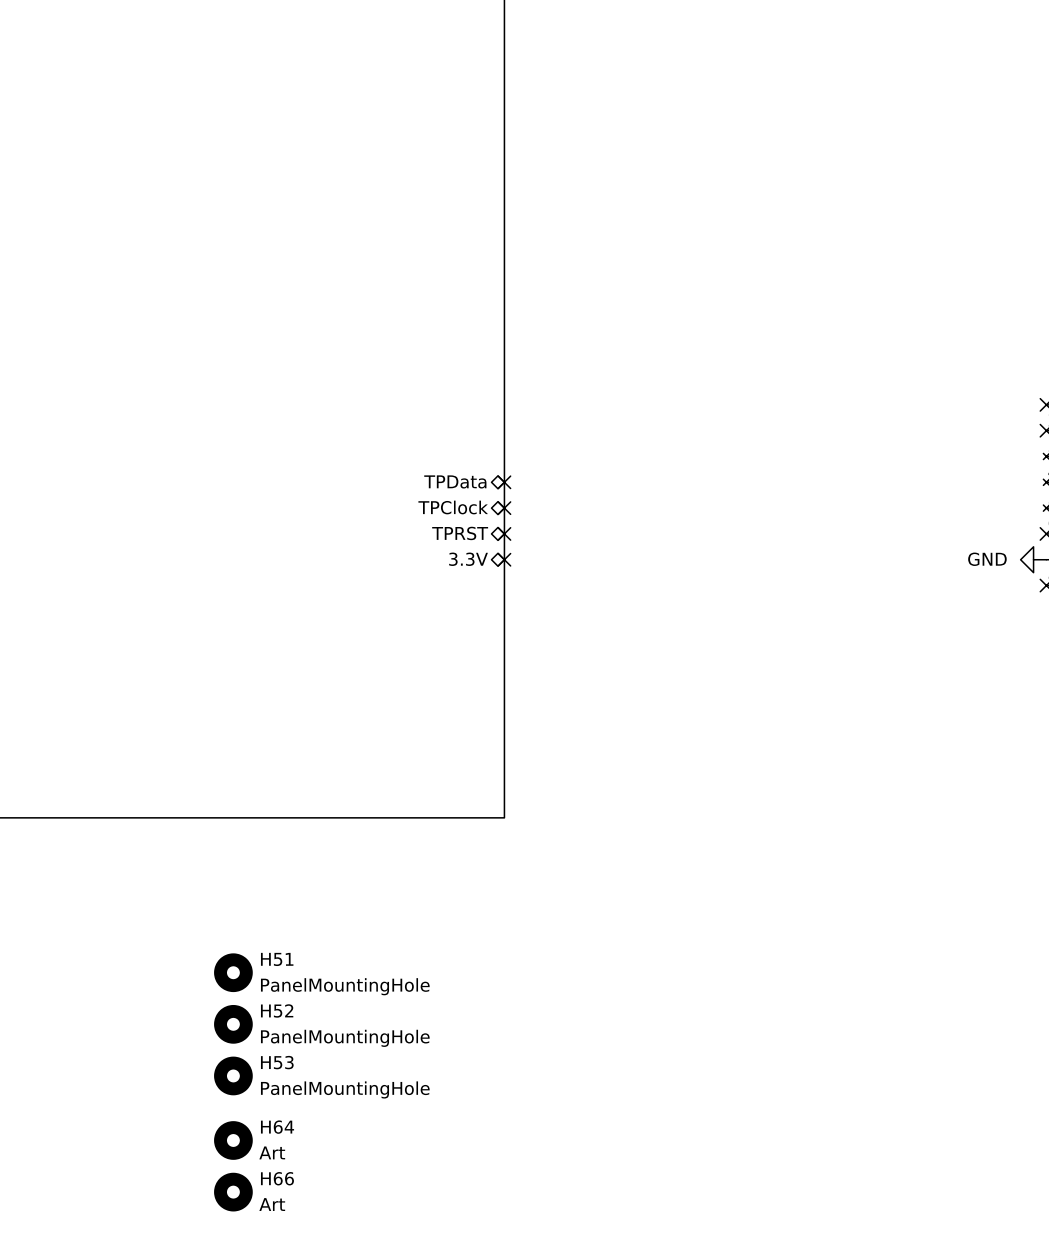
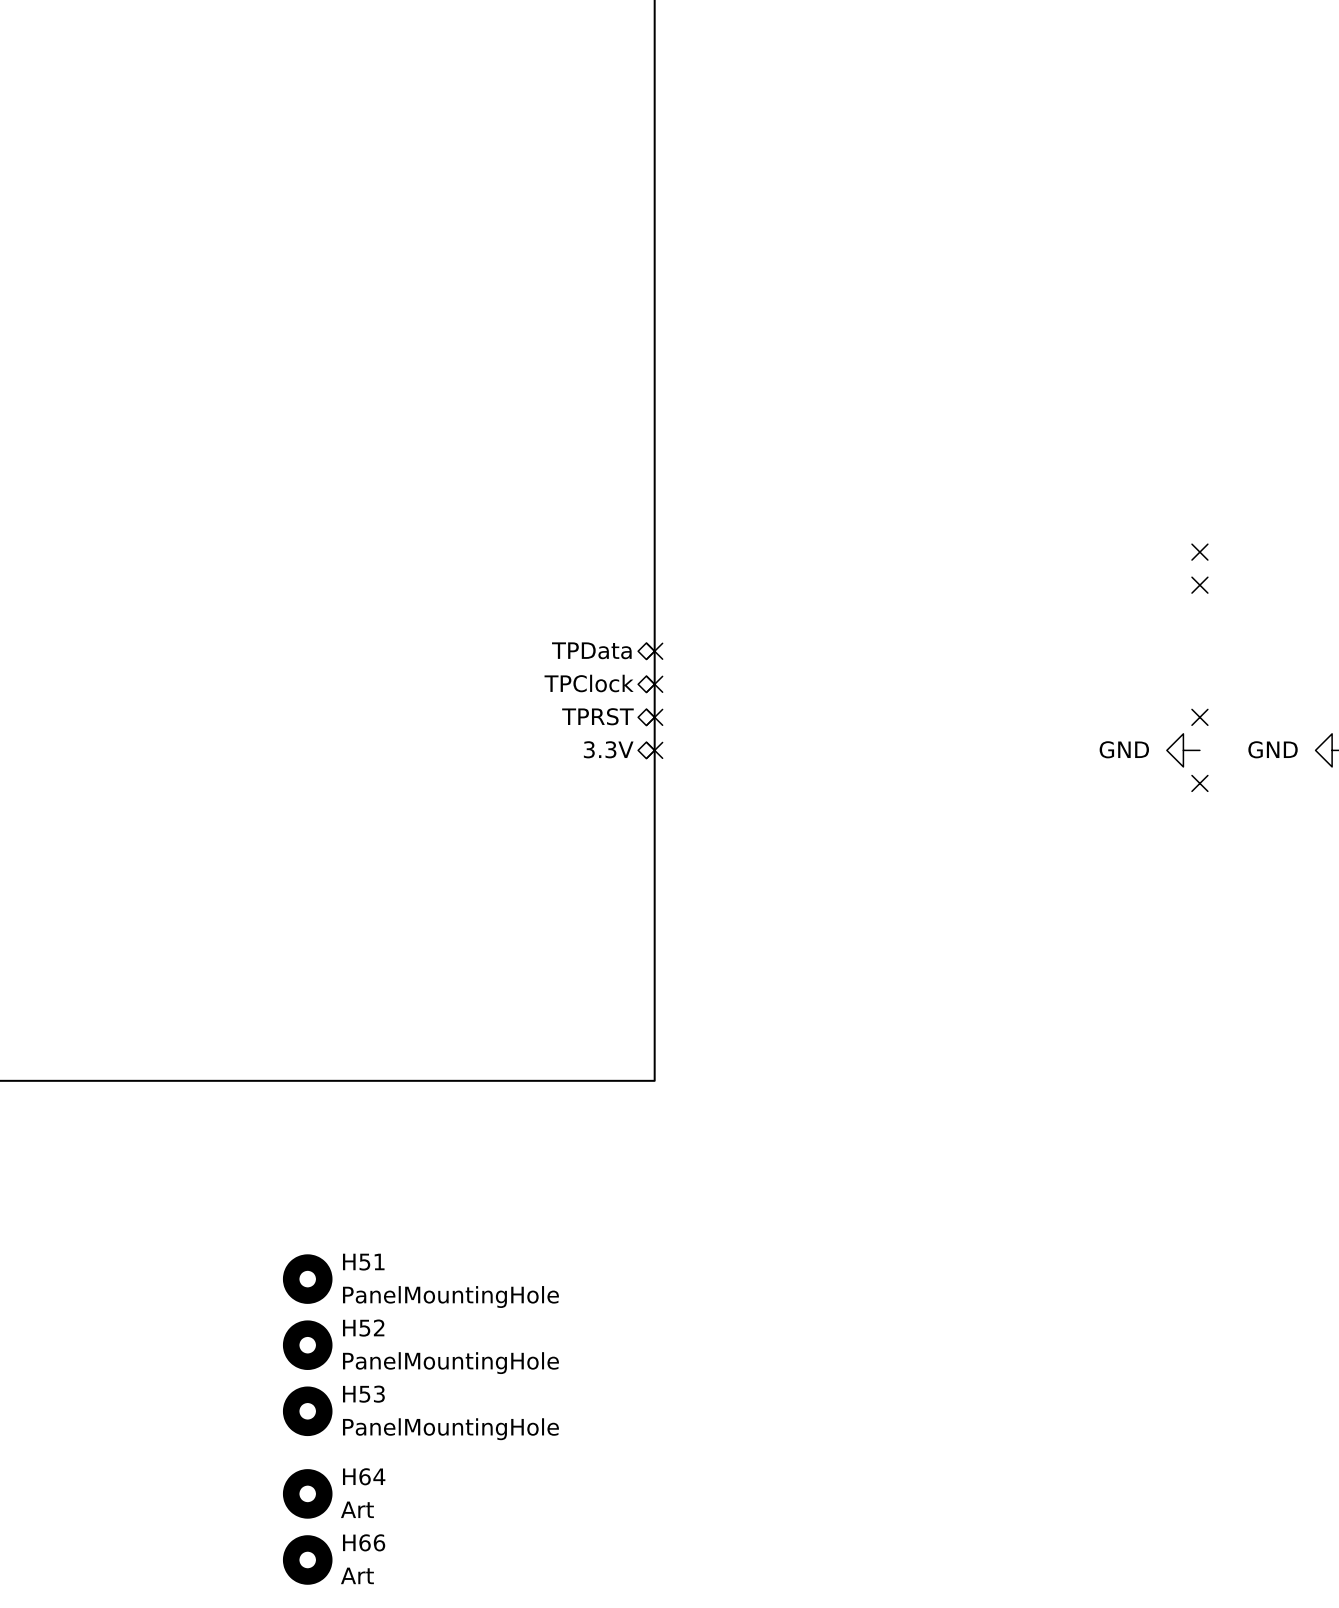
no-connect mark: none -> (1199, 552)
no-connect mark: none -> (1199, 585)
no-connect mark: none -> (1199, 717)
power symbol: none -> GND (1183, 750)
no-connect mark: none -> (1199, 783)

